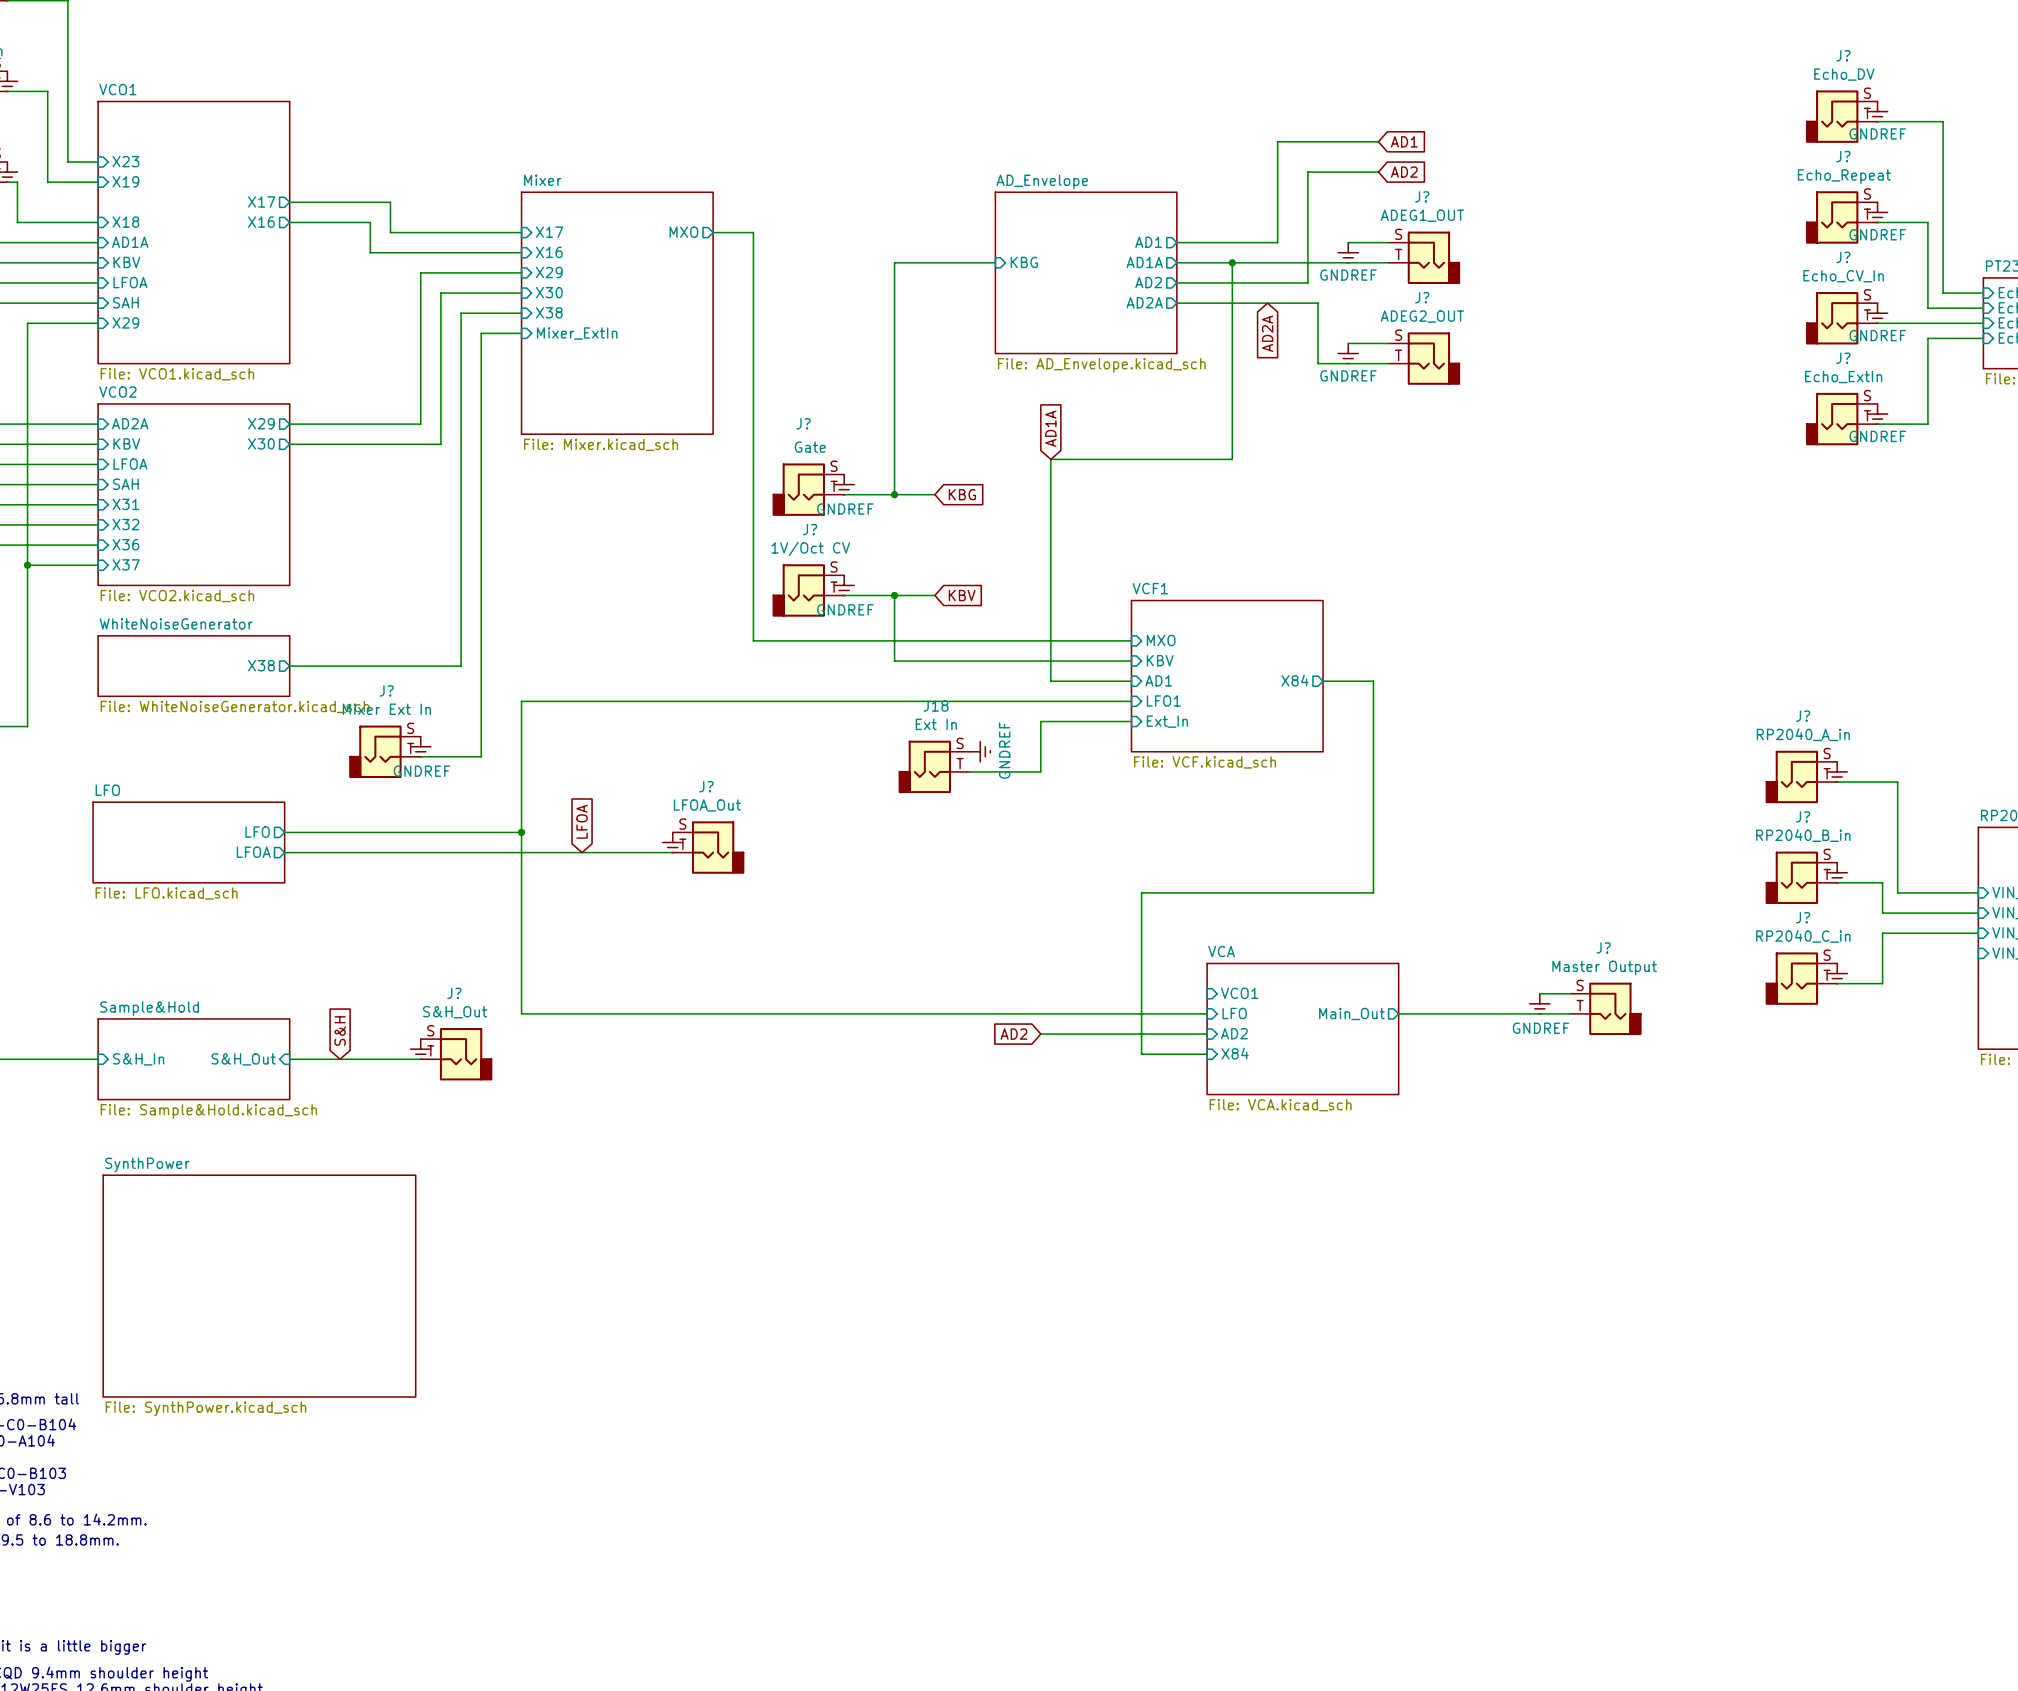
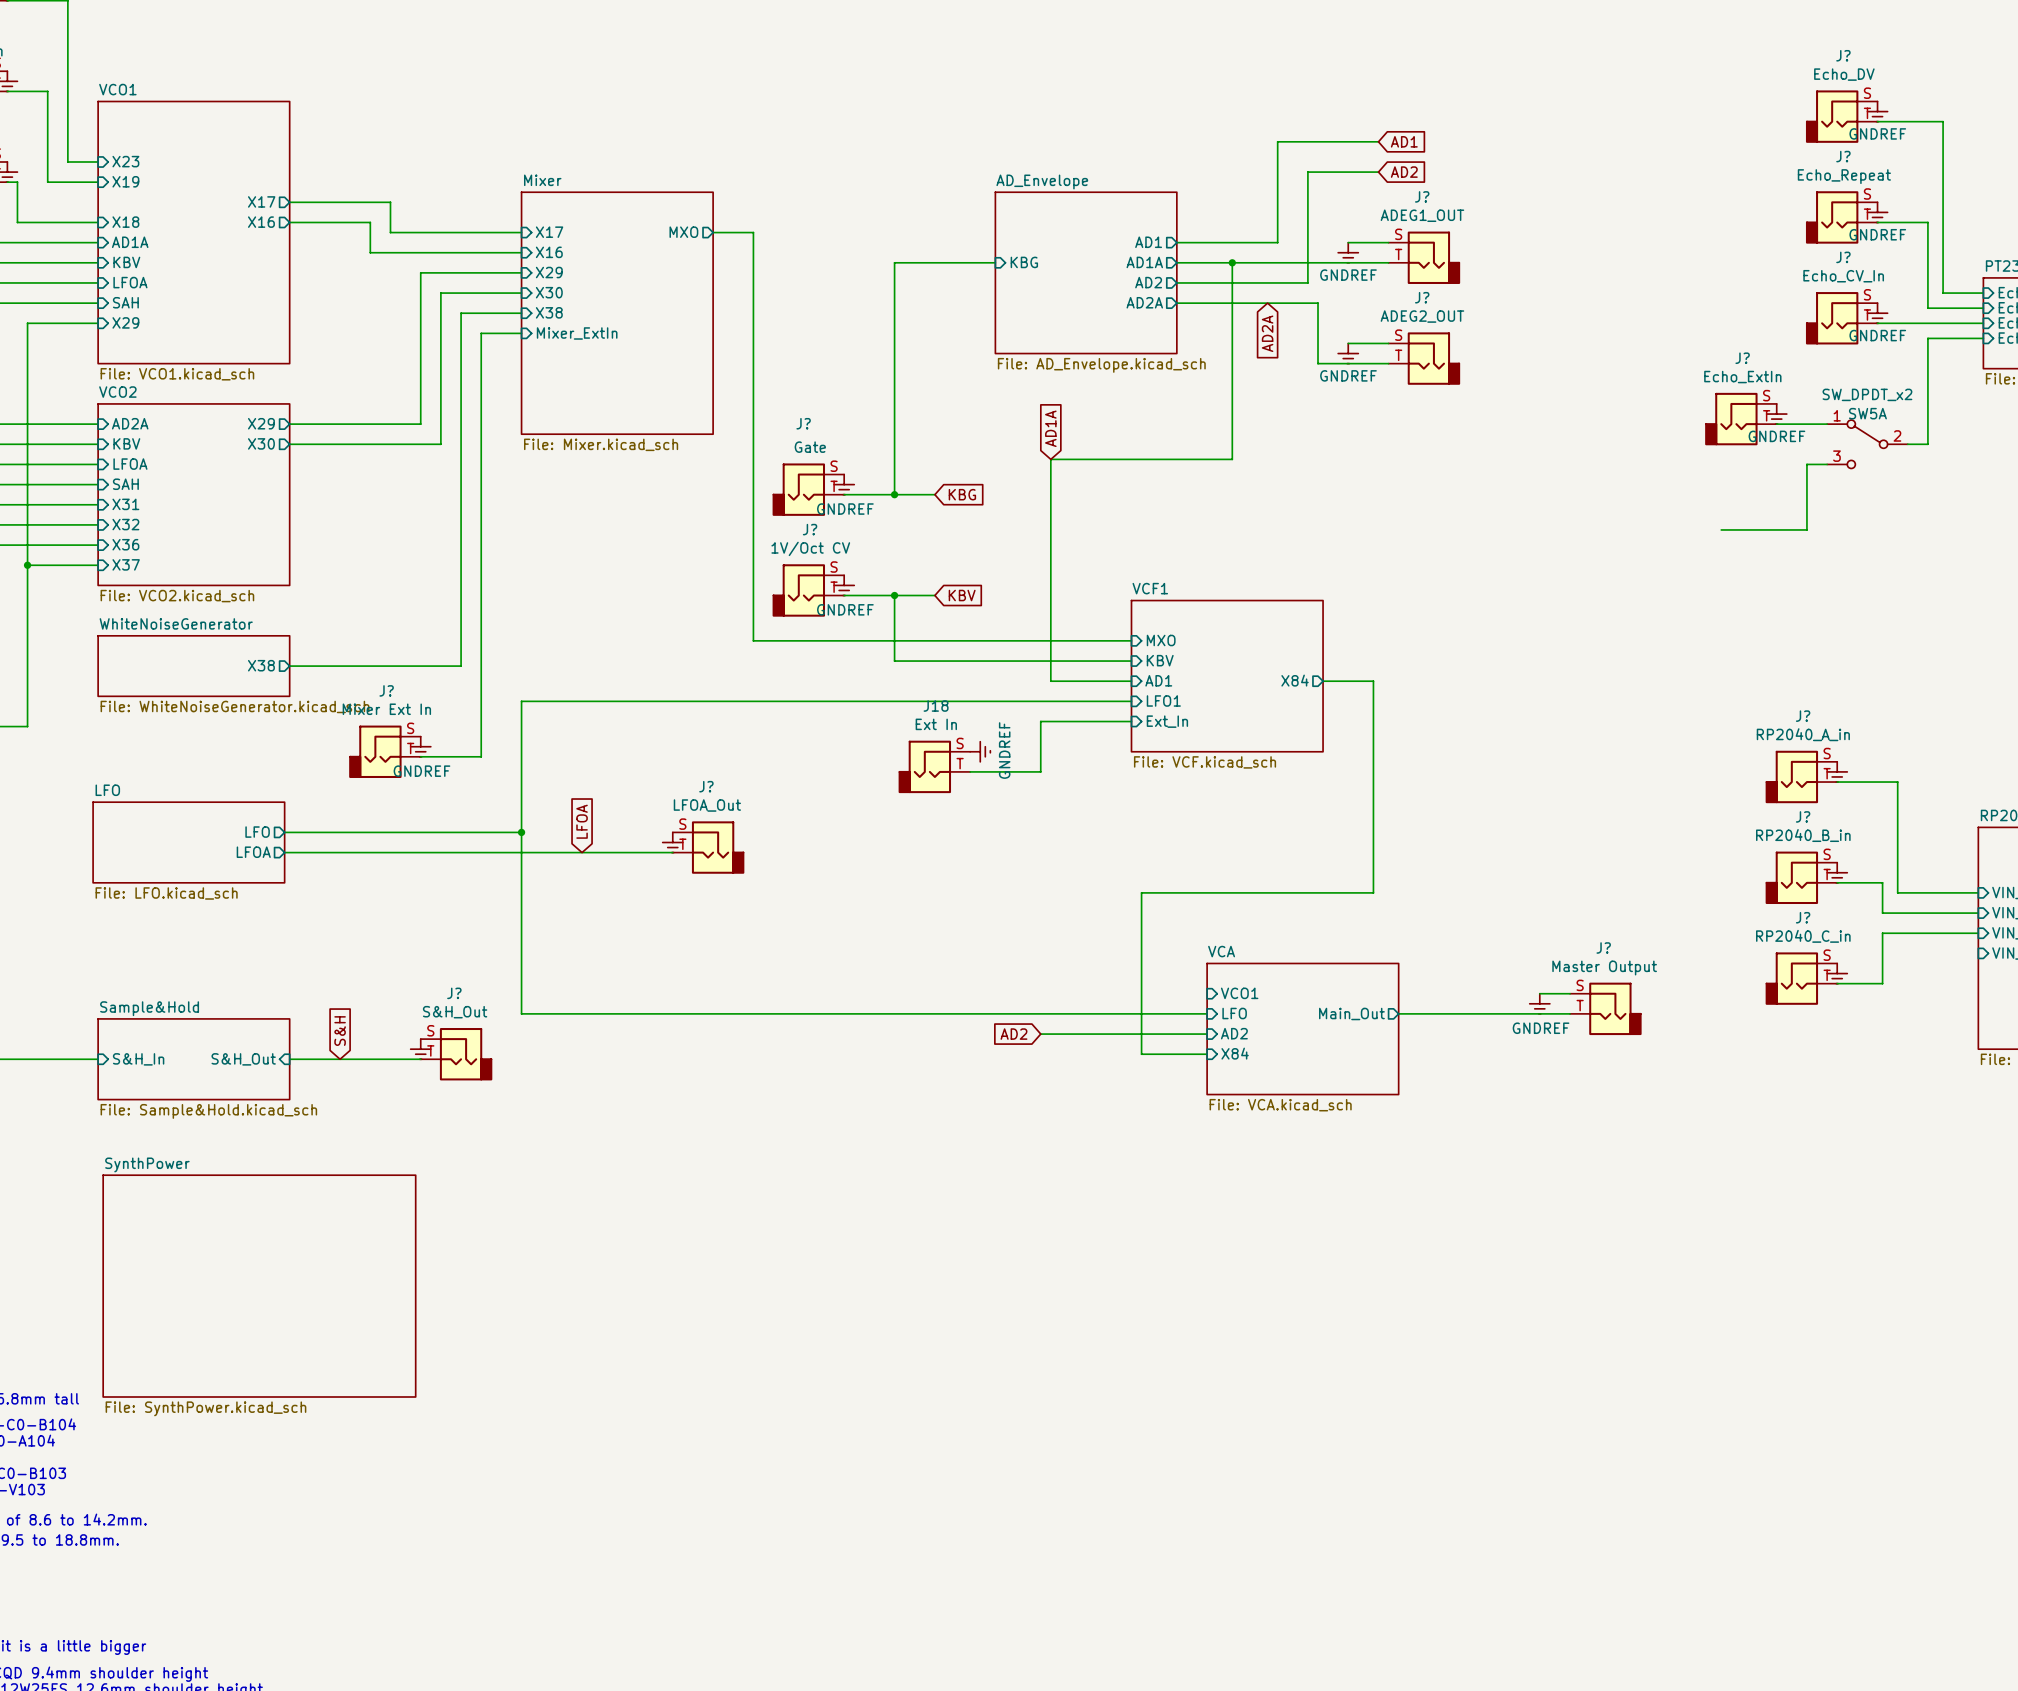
power symbol position: GNDREF (1877, 414) -> GNDREF (1776, 414)
J? position: (1841, 419) -> (1740, 419)
wire: none -> (1776, 424) (1827, 424)
wire: (1877, 424) (1927, 424) -> (1907, 444) (1927, 444) (1927, 424)
SW5A: none -> SW_DPDT_x2 (1867, 444)
wire: none -> (1827, 464) (1806, 464) (1806, 529) (1721, 529)

